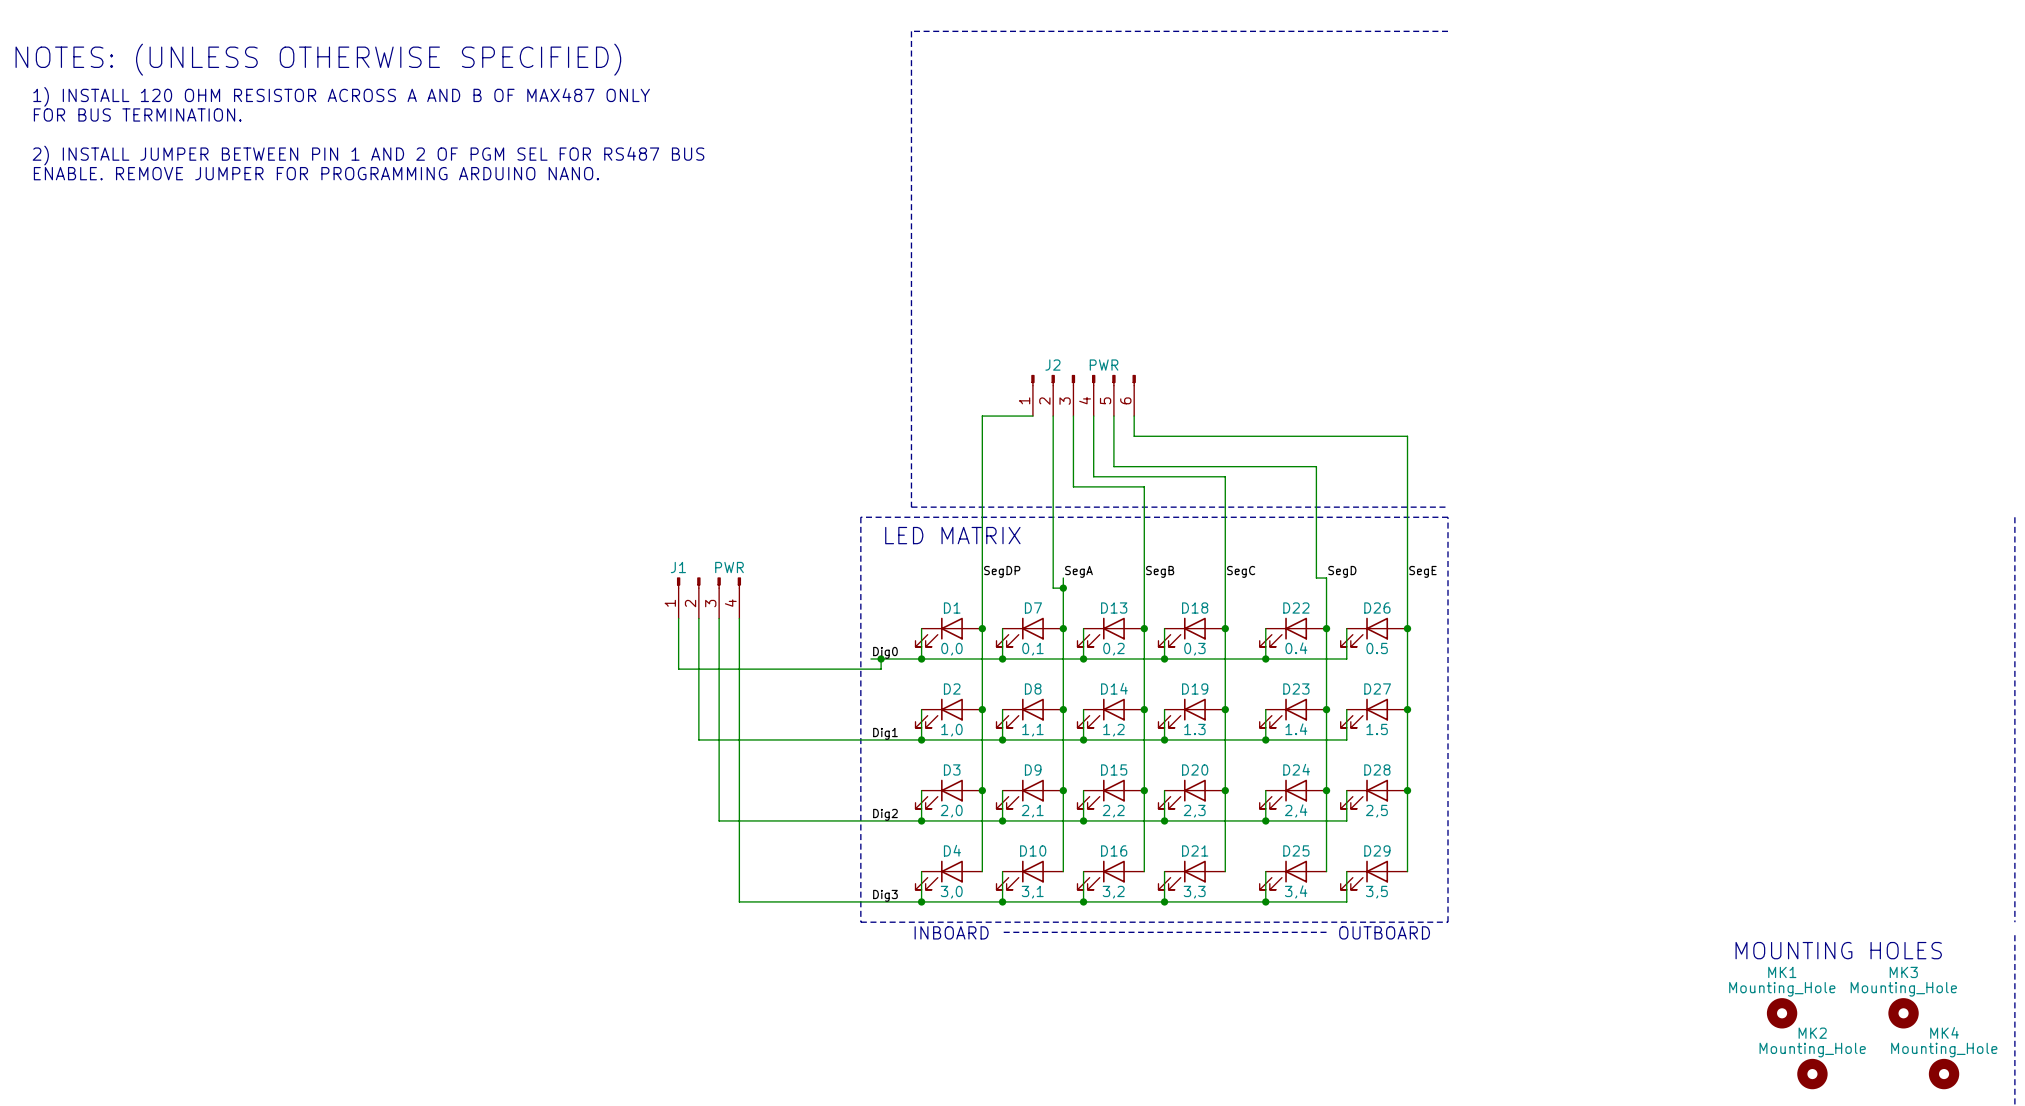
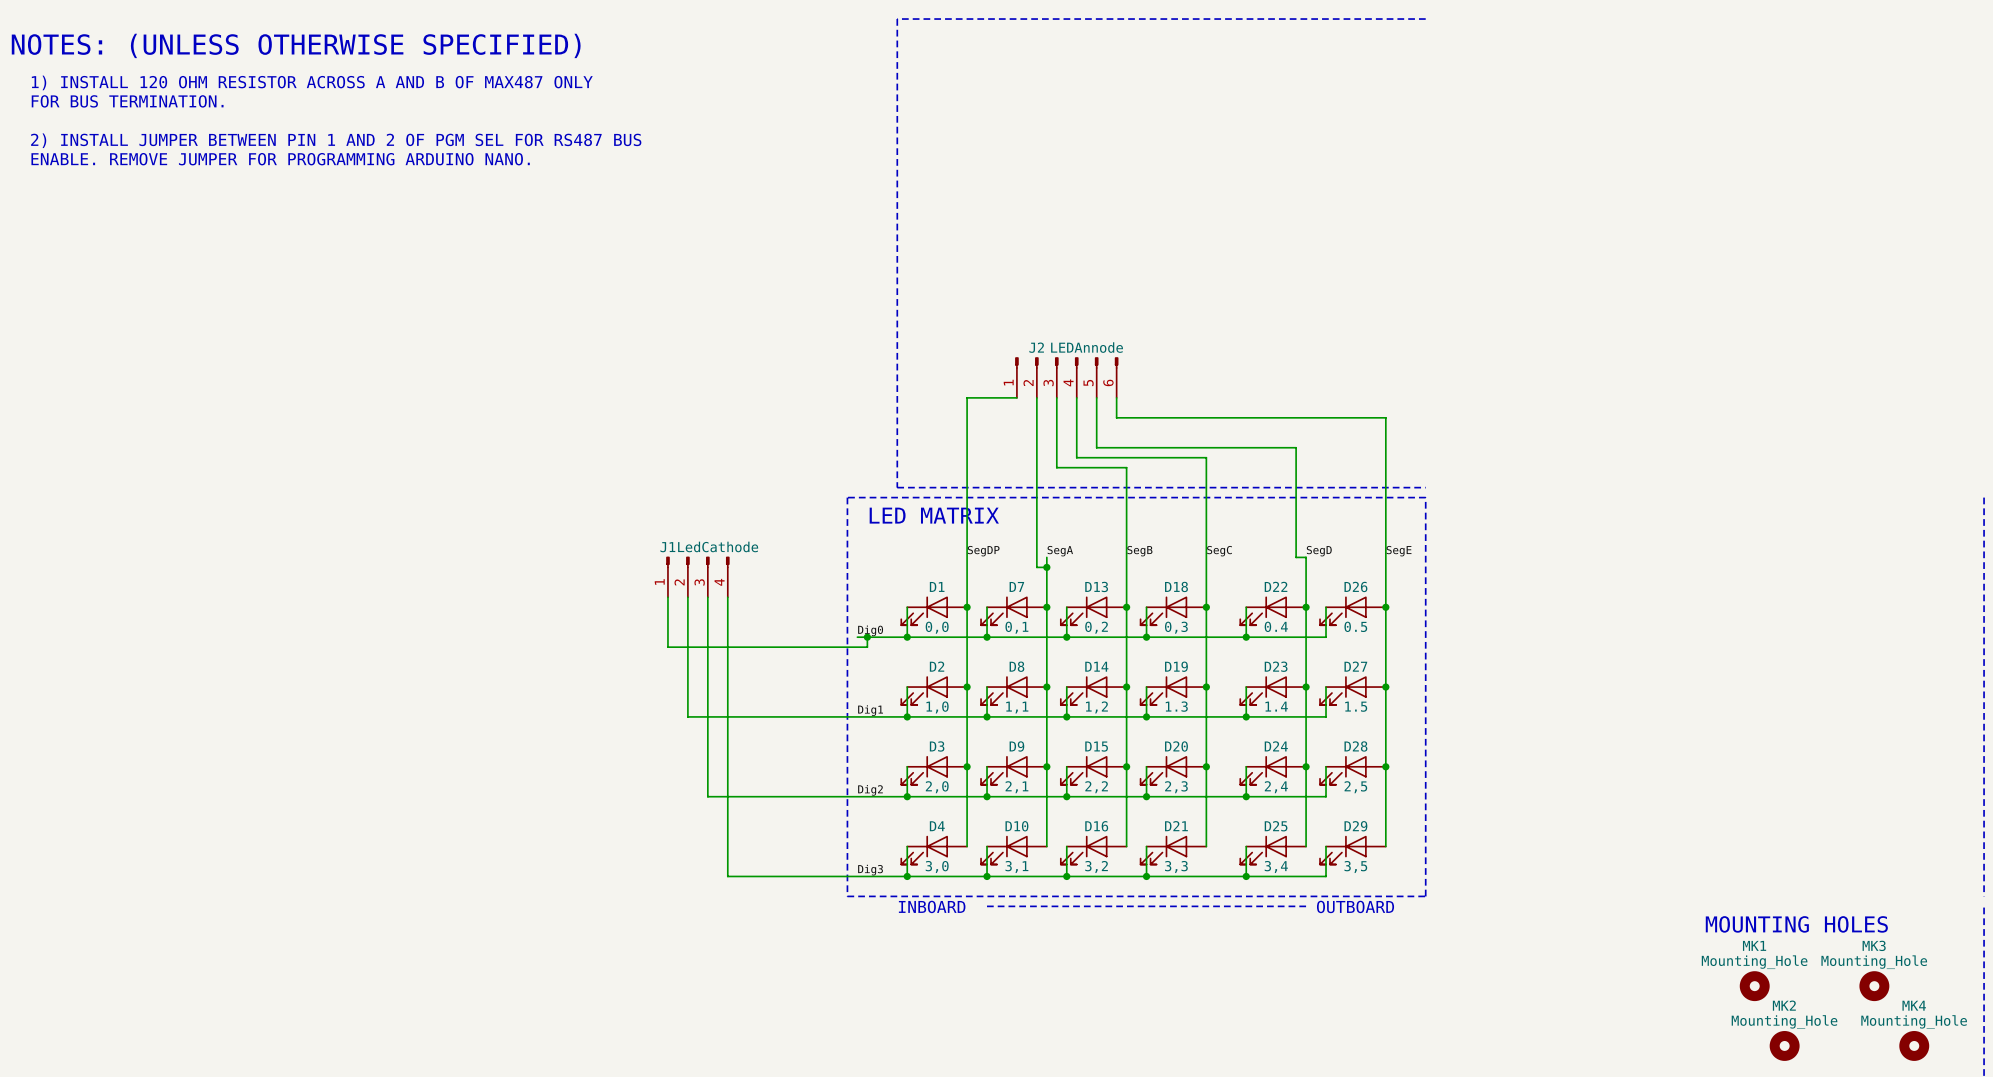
J2 value: PWR (1104, 365) -> LEDAnnode (1087, 347)
J1 value: PWR (729, 567) -> LedCathode (718, 546)

